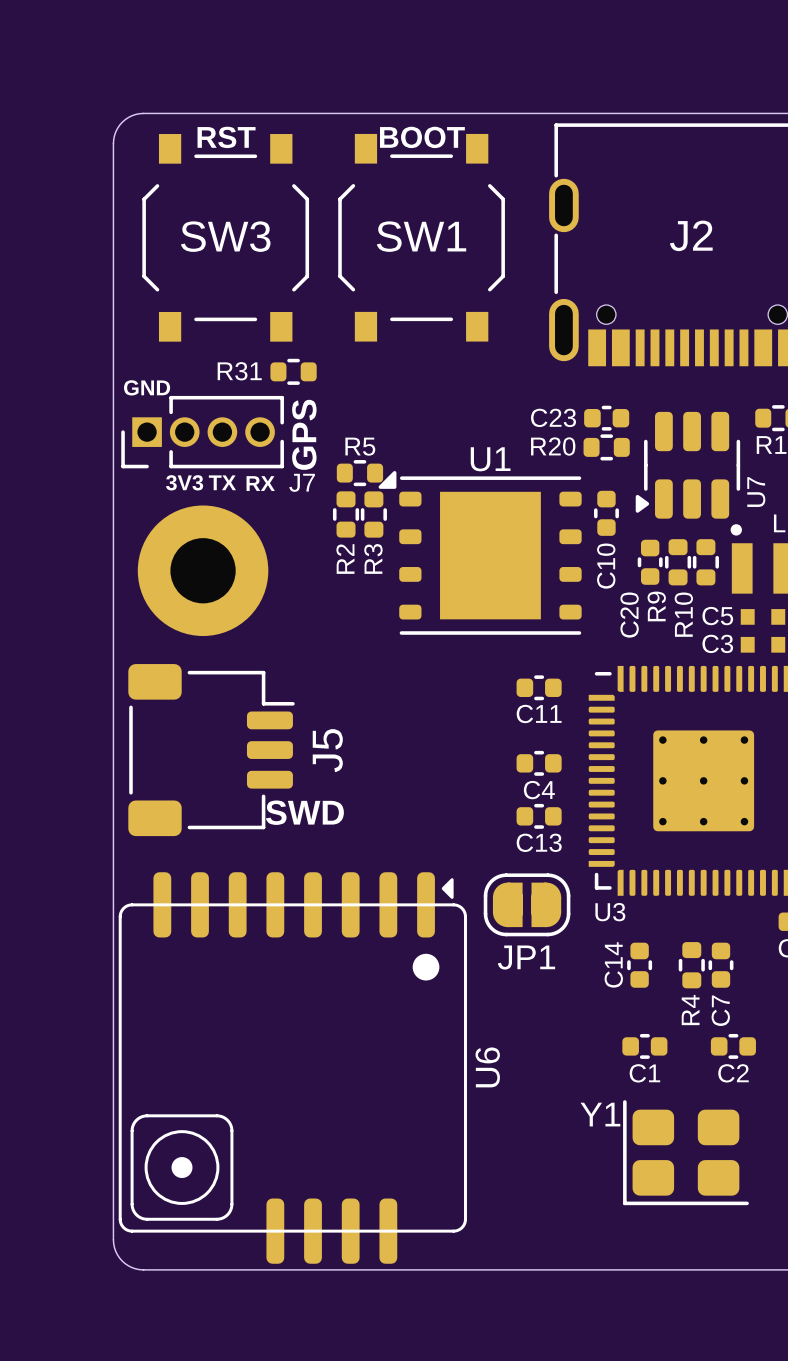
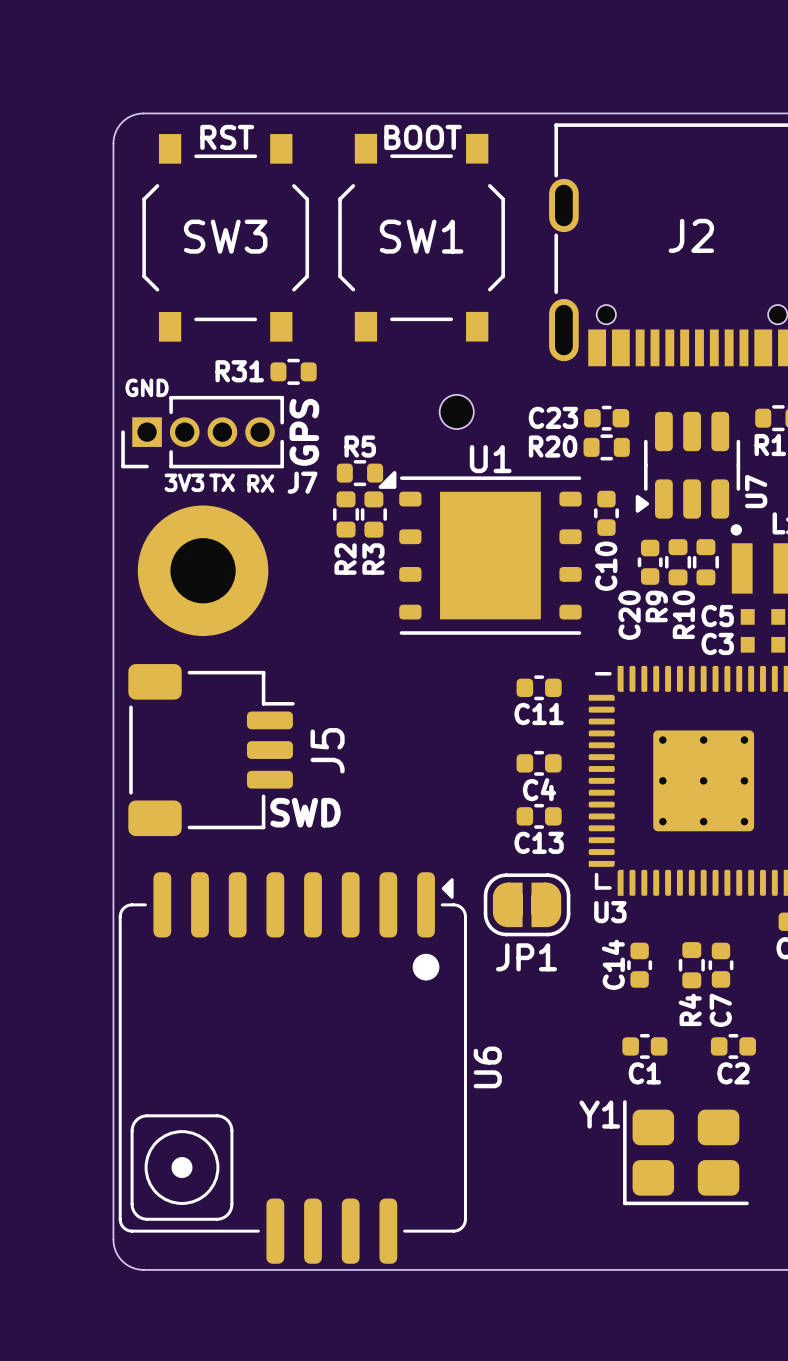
part: none -> (456, 411)
U6 footprint: [118, 872, 467, 1264] -> [118, 872, 467, 1264]

